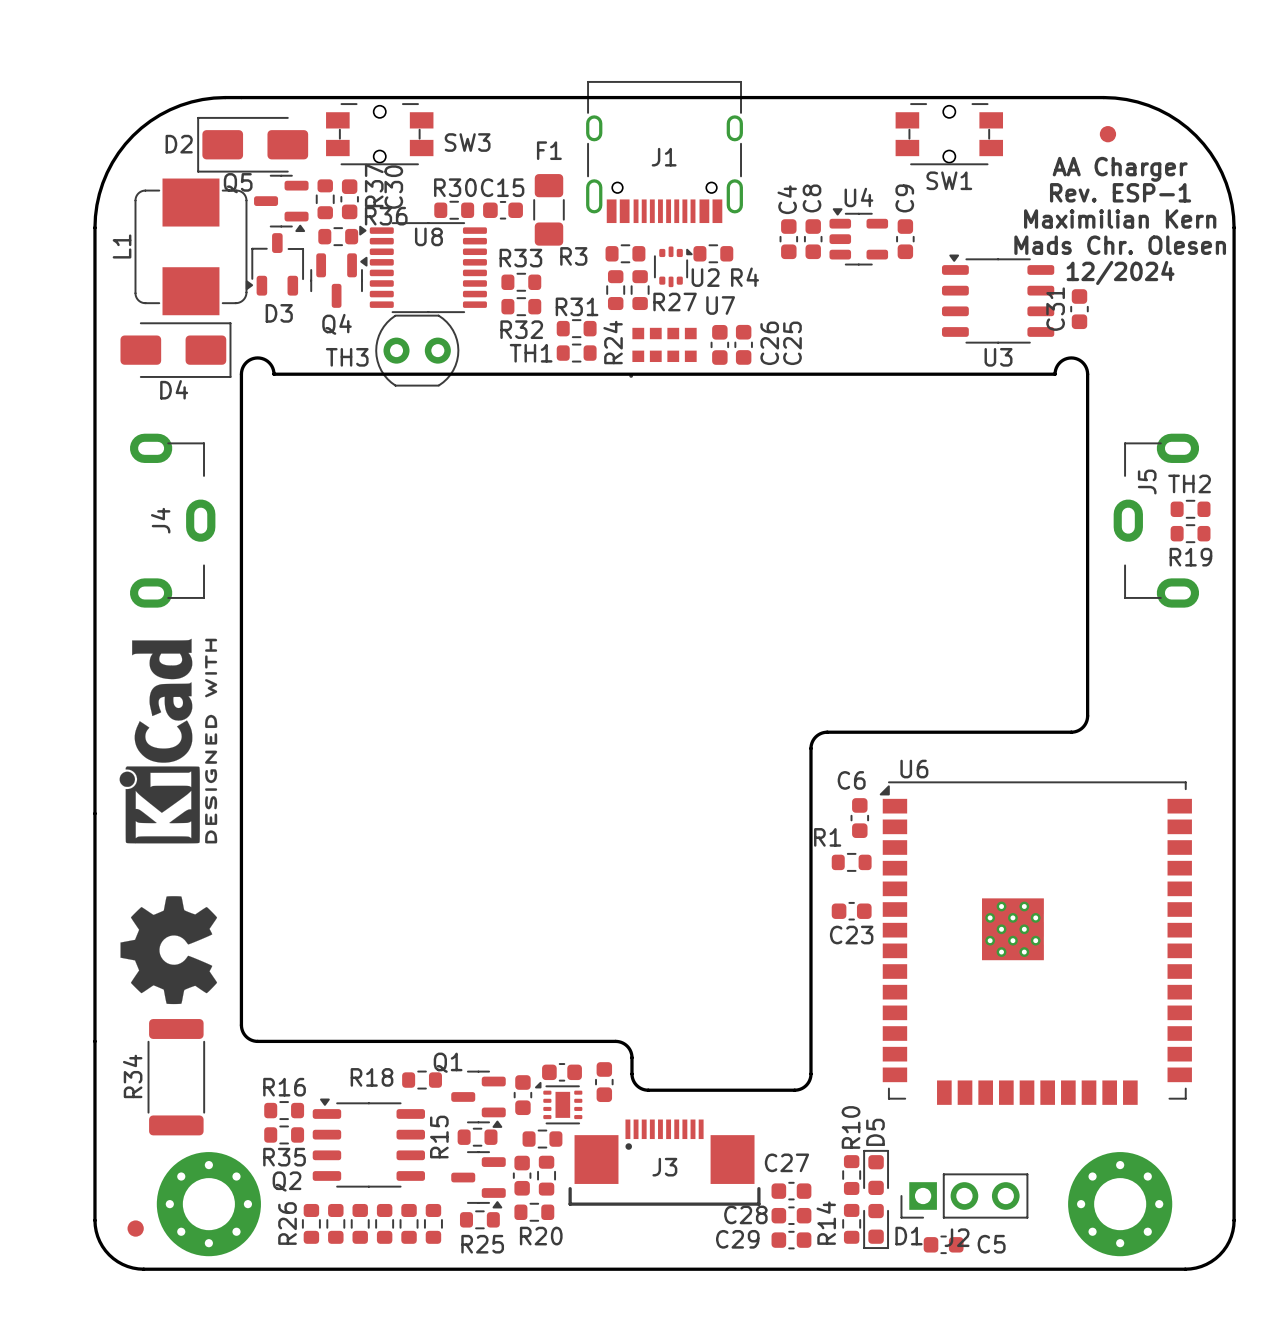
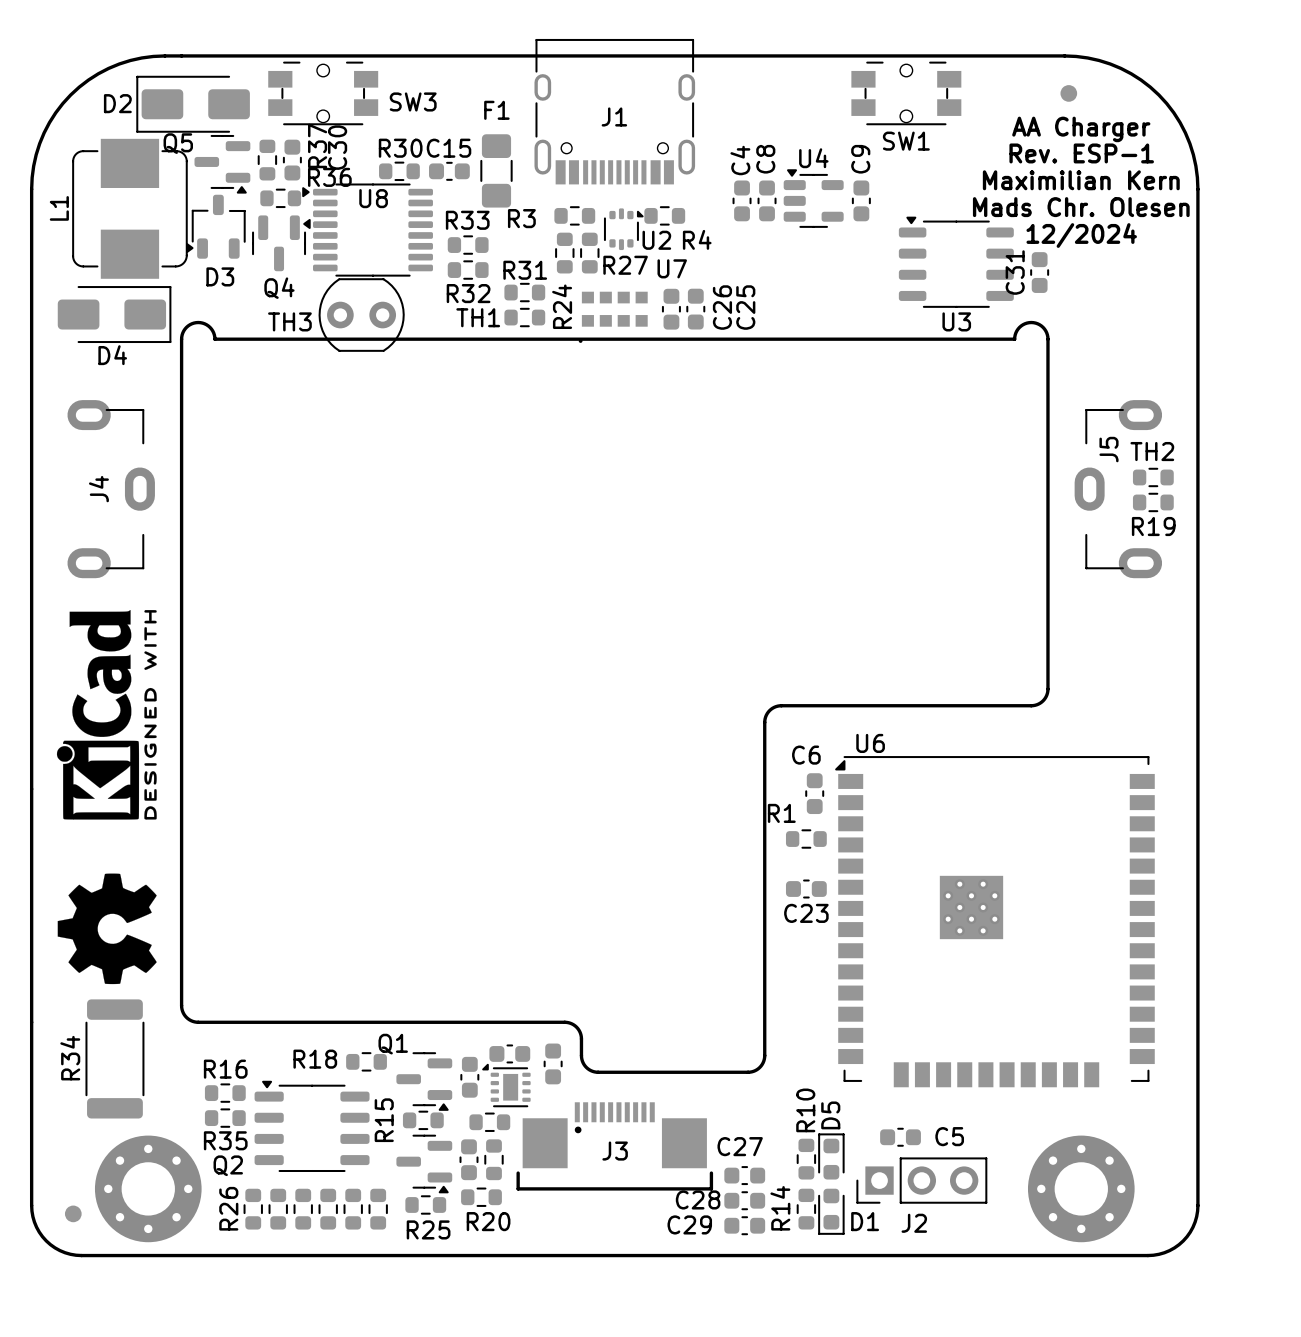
C5 position: (943, 1244) -> (900, 1137)

